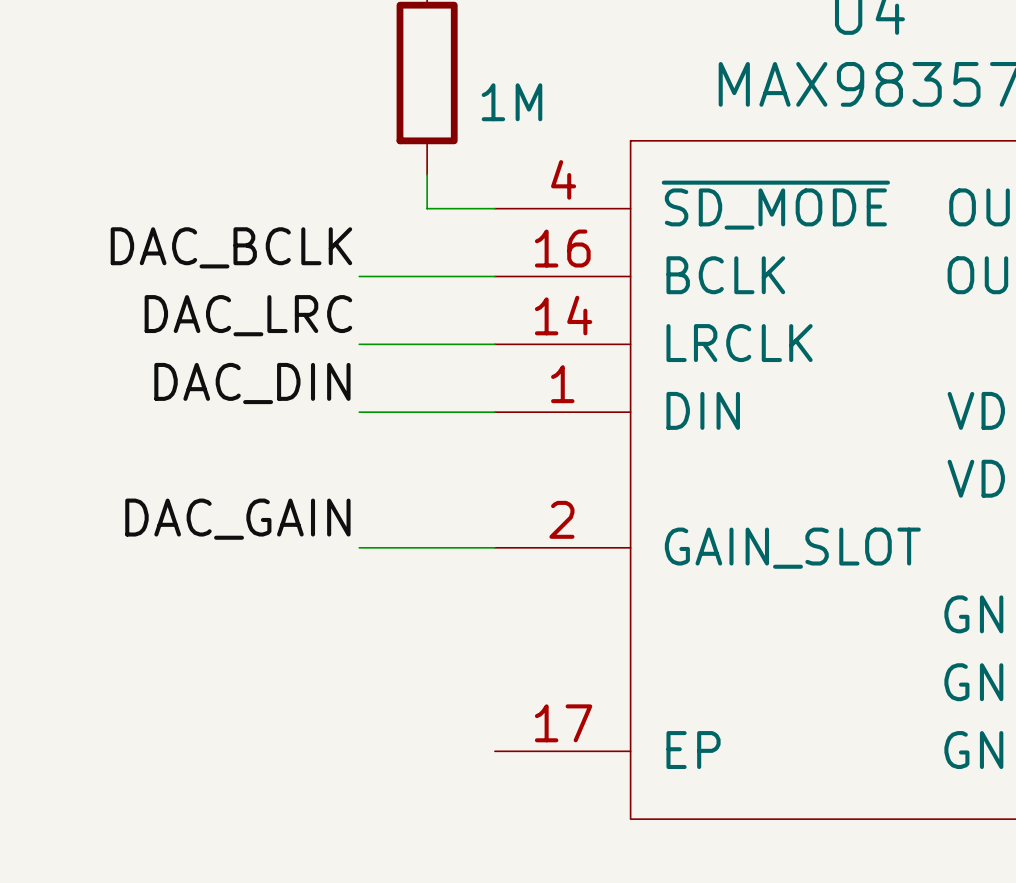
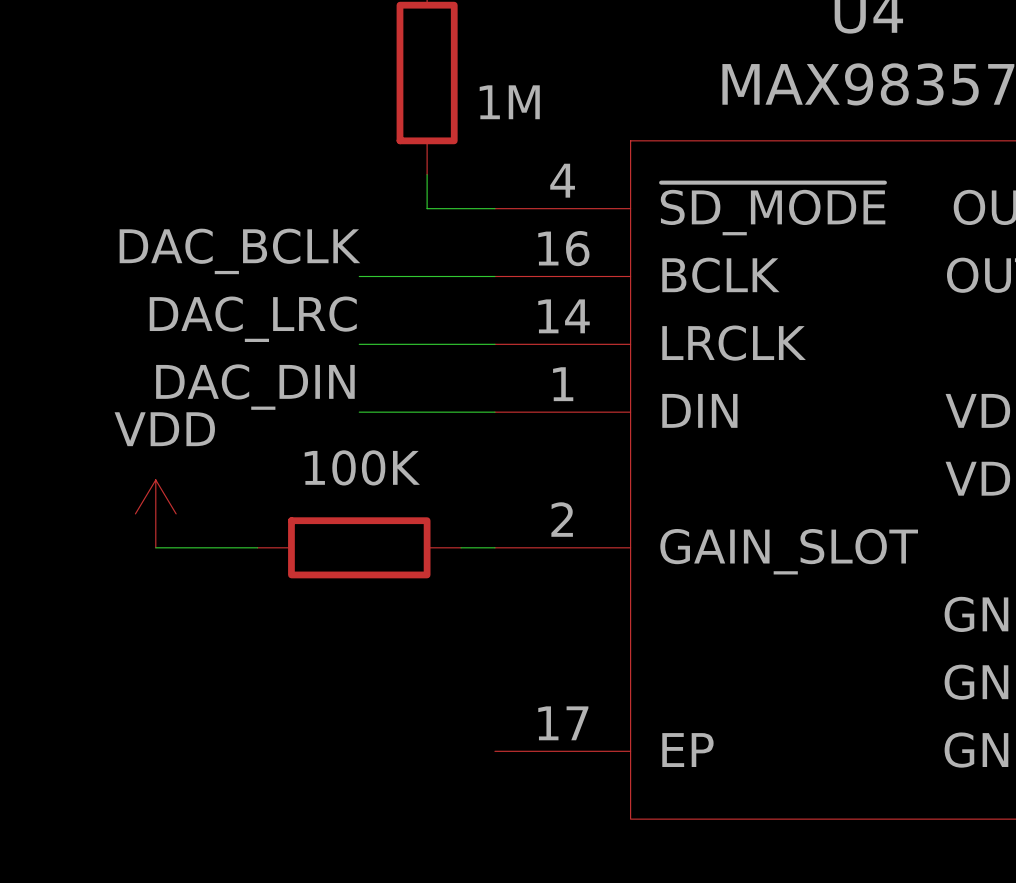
power symbol: none -> VDD (155, 513)
label: DAC_GAIN (237, 519) -> none
wire: (359, 547) (461, 547) -> (155, 547) (257, 547)
part: none -> 100K (359, 547)

